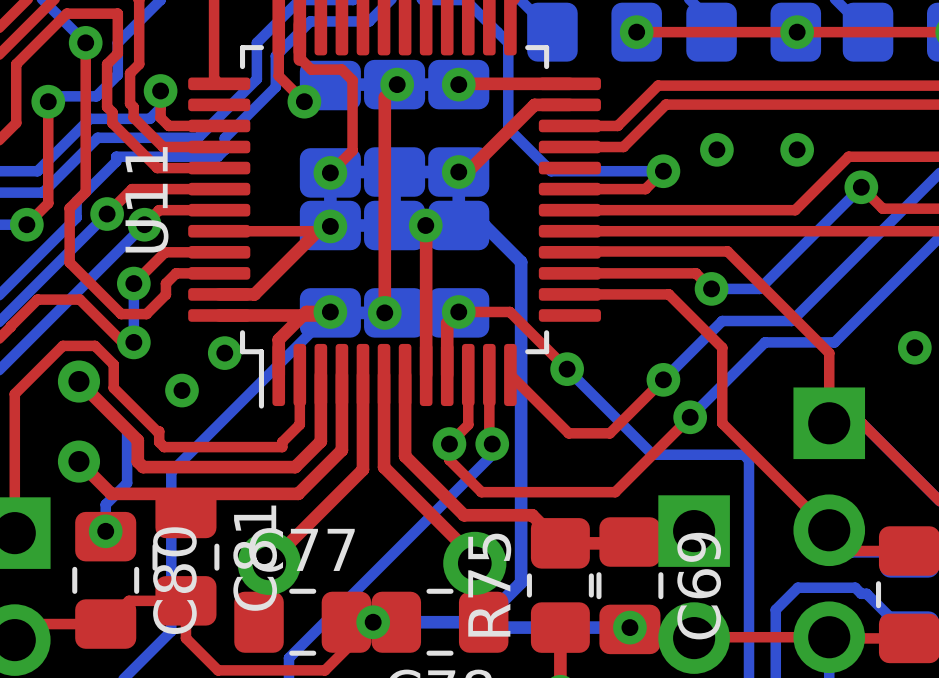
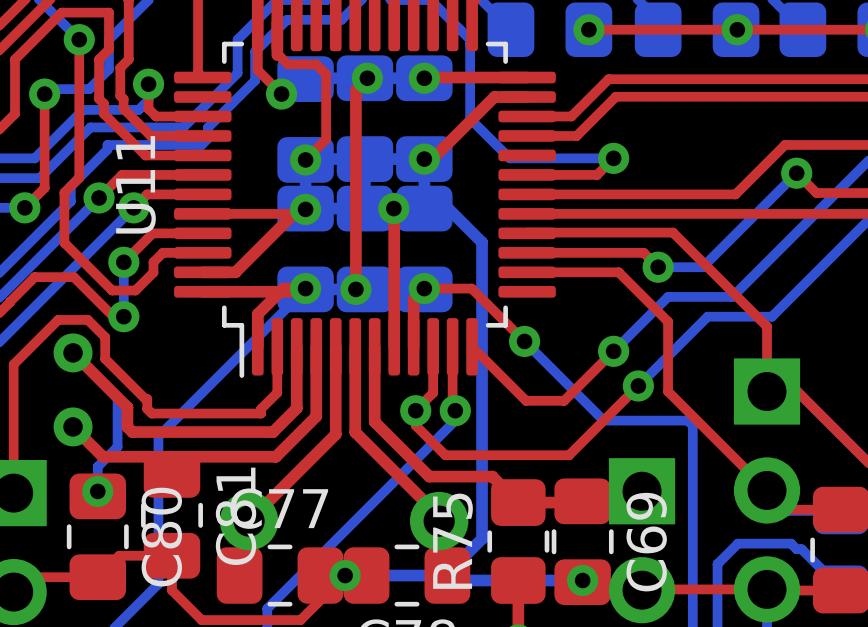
via: (716, 149) -> none
via: (797, 149) -> none
via: (914, 347) -> none
via: (224, 353) -> none
via: (181, 390) -> none

